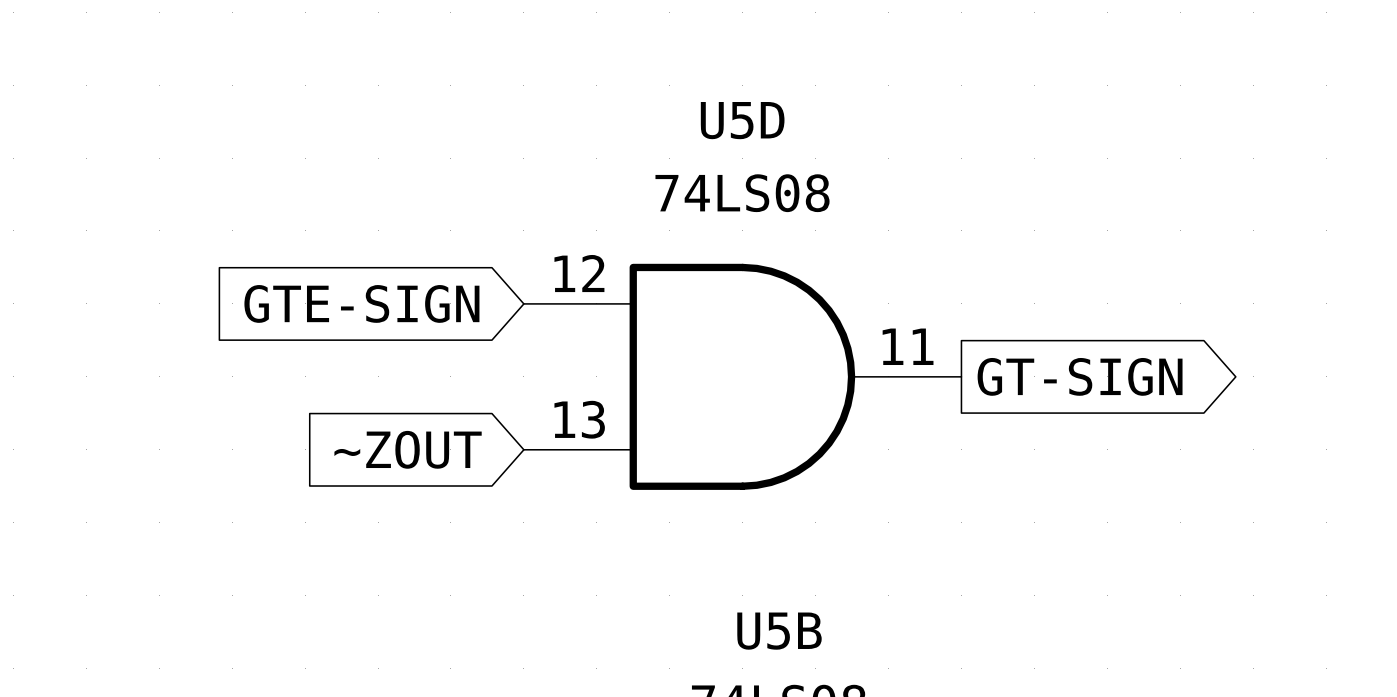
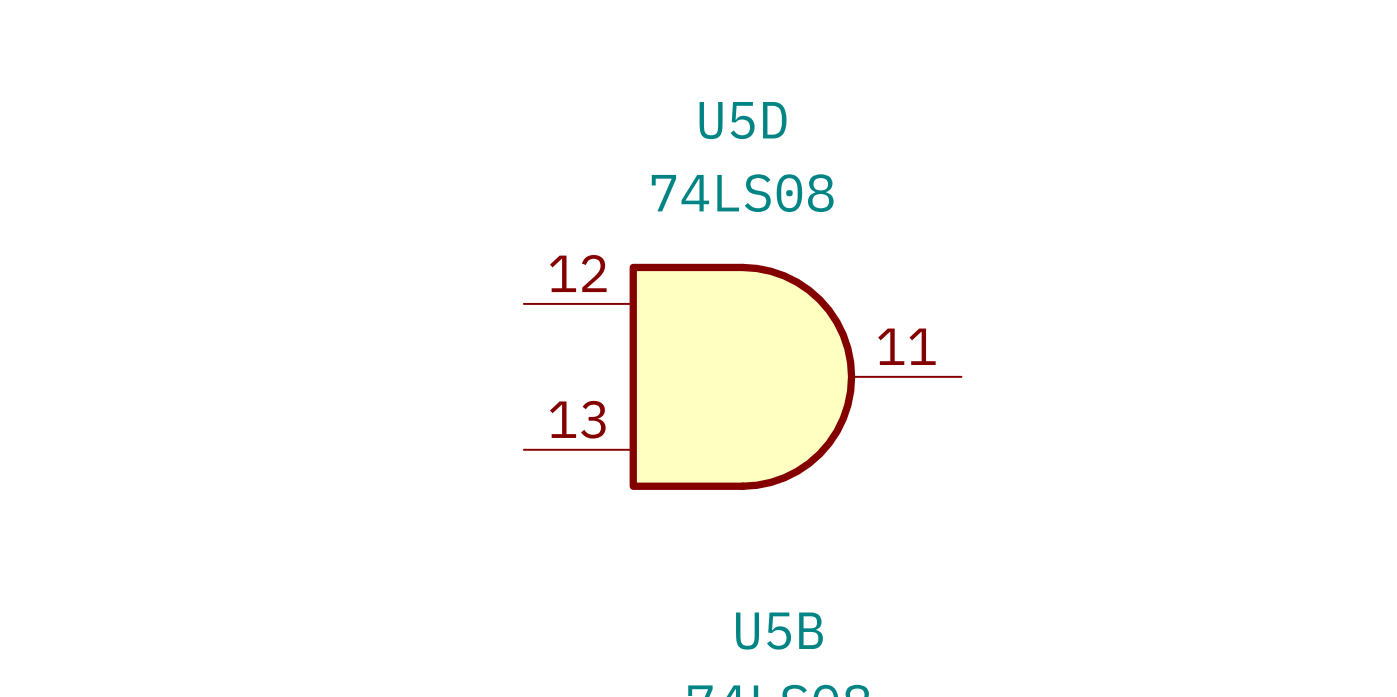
global label: GTE-SIGN (361, 303) -> none
global label: GT-SIGN (1080, 376) -> none
global label: ~ZOUT (408, 449) -> none

